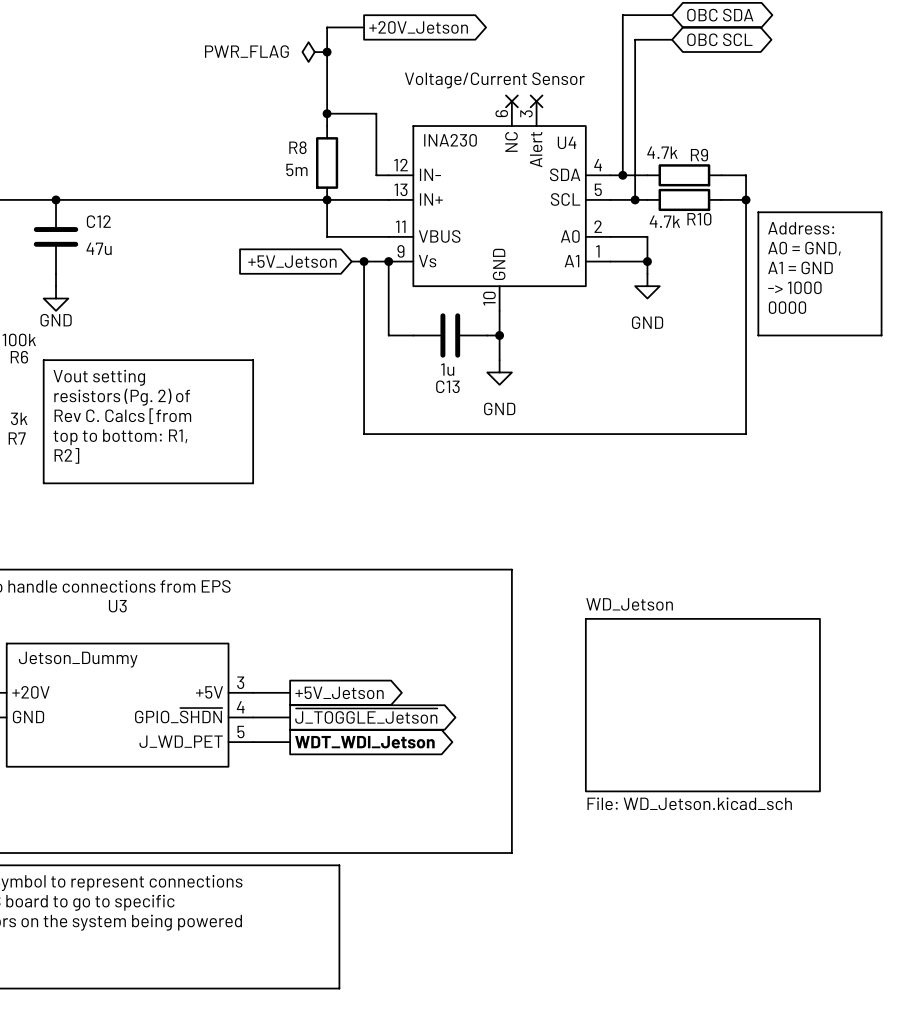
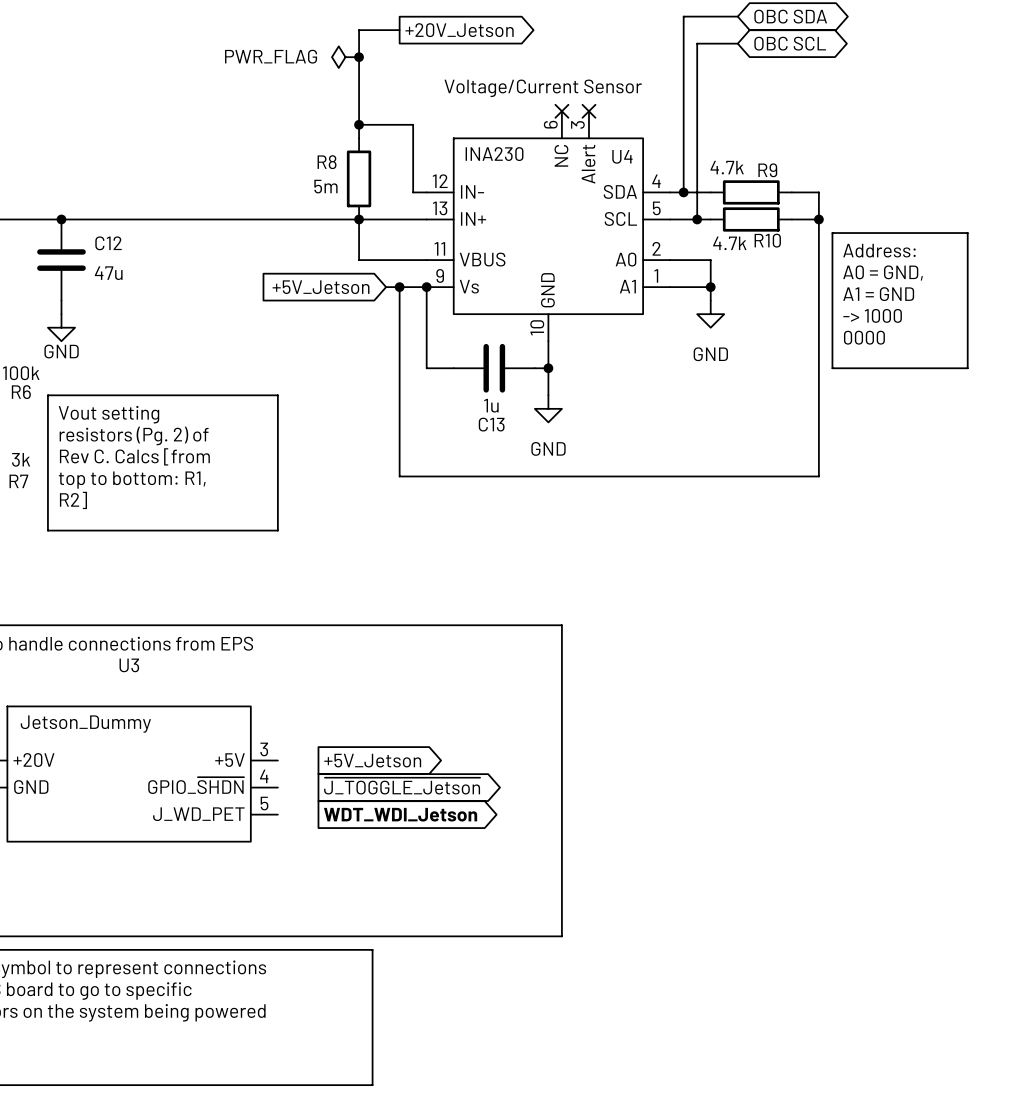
wire: (253, 692) (290, 692) -> none
sheet WD_Jetson: File: WD_Jetson.kicad_sch (702, 705) -> none
wire: (253, 717) (290, 717) -> none
wire: (253, 742) (290, 742) -> none

